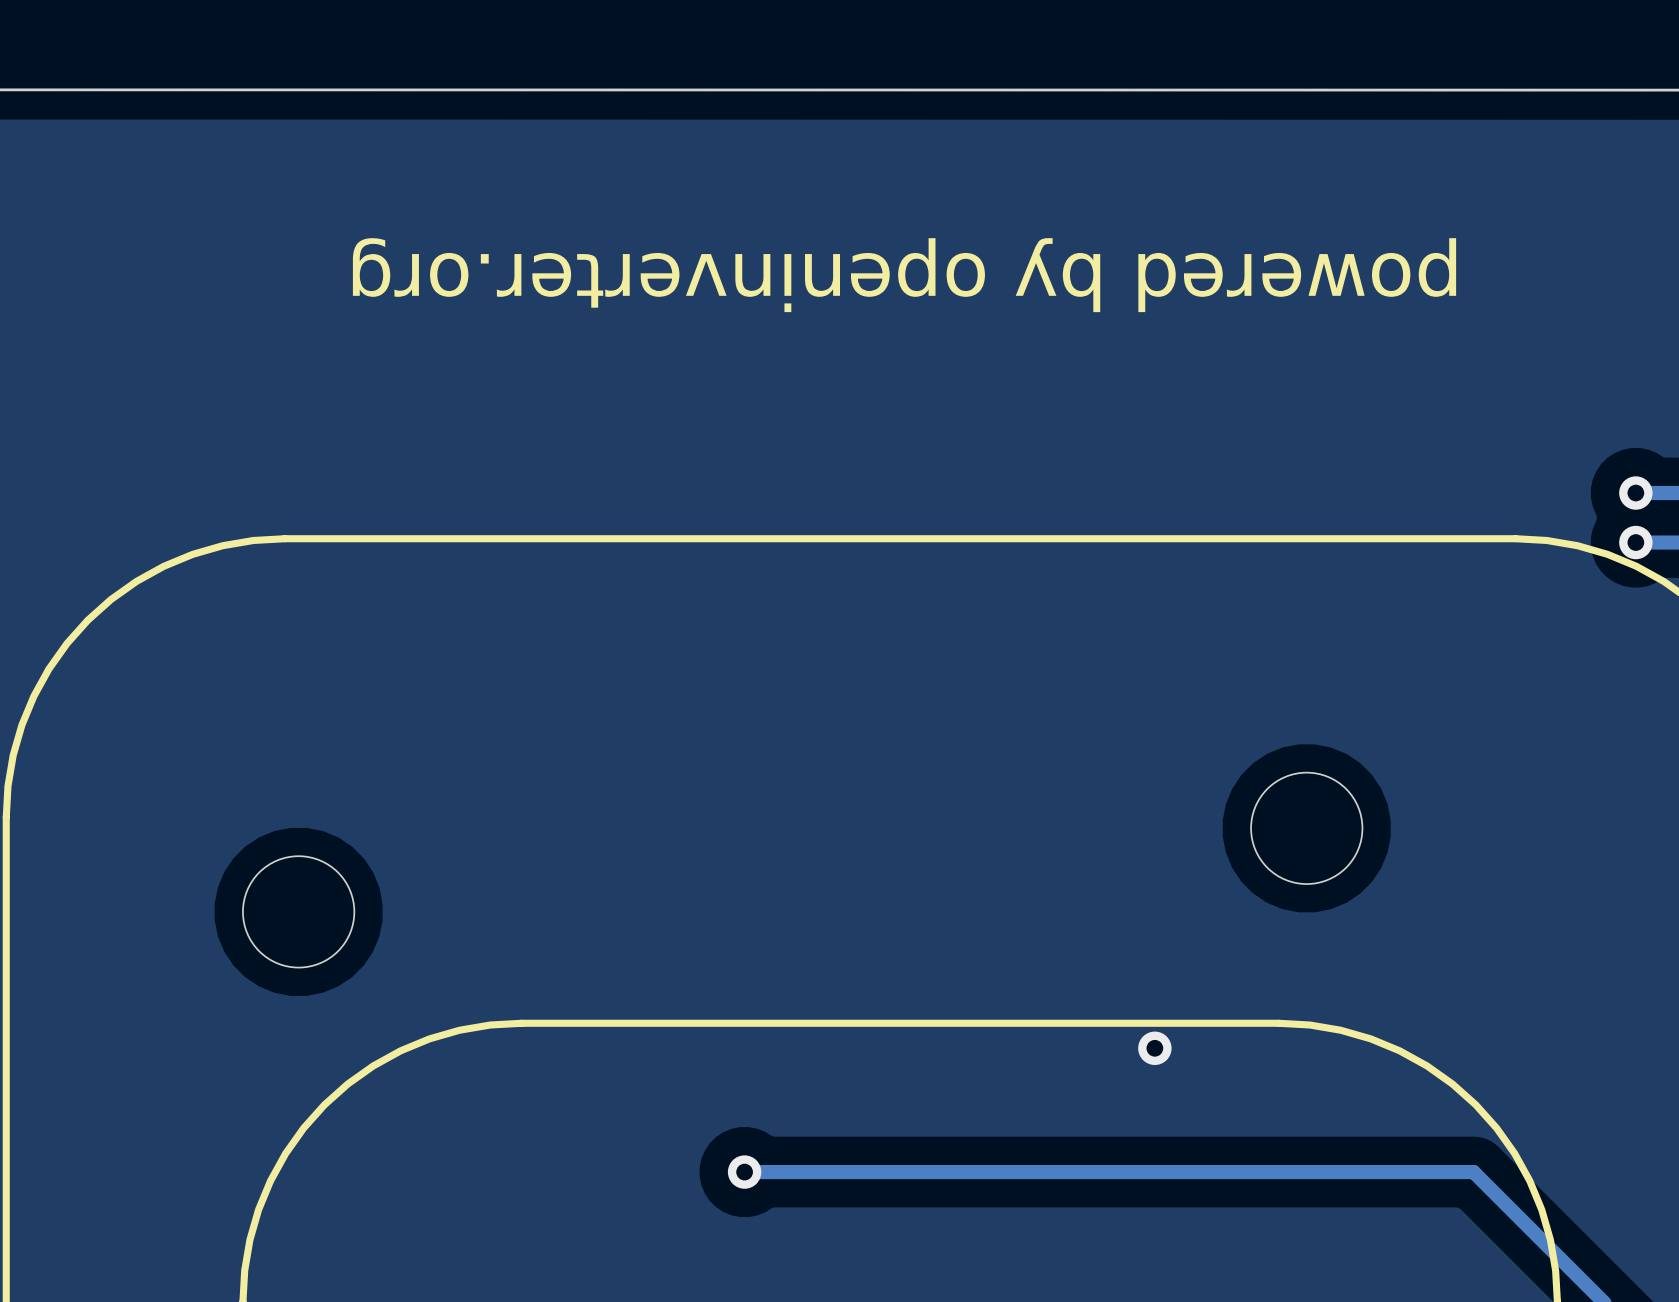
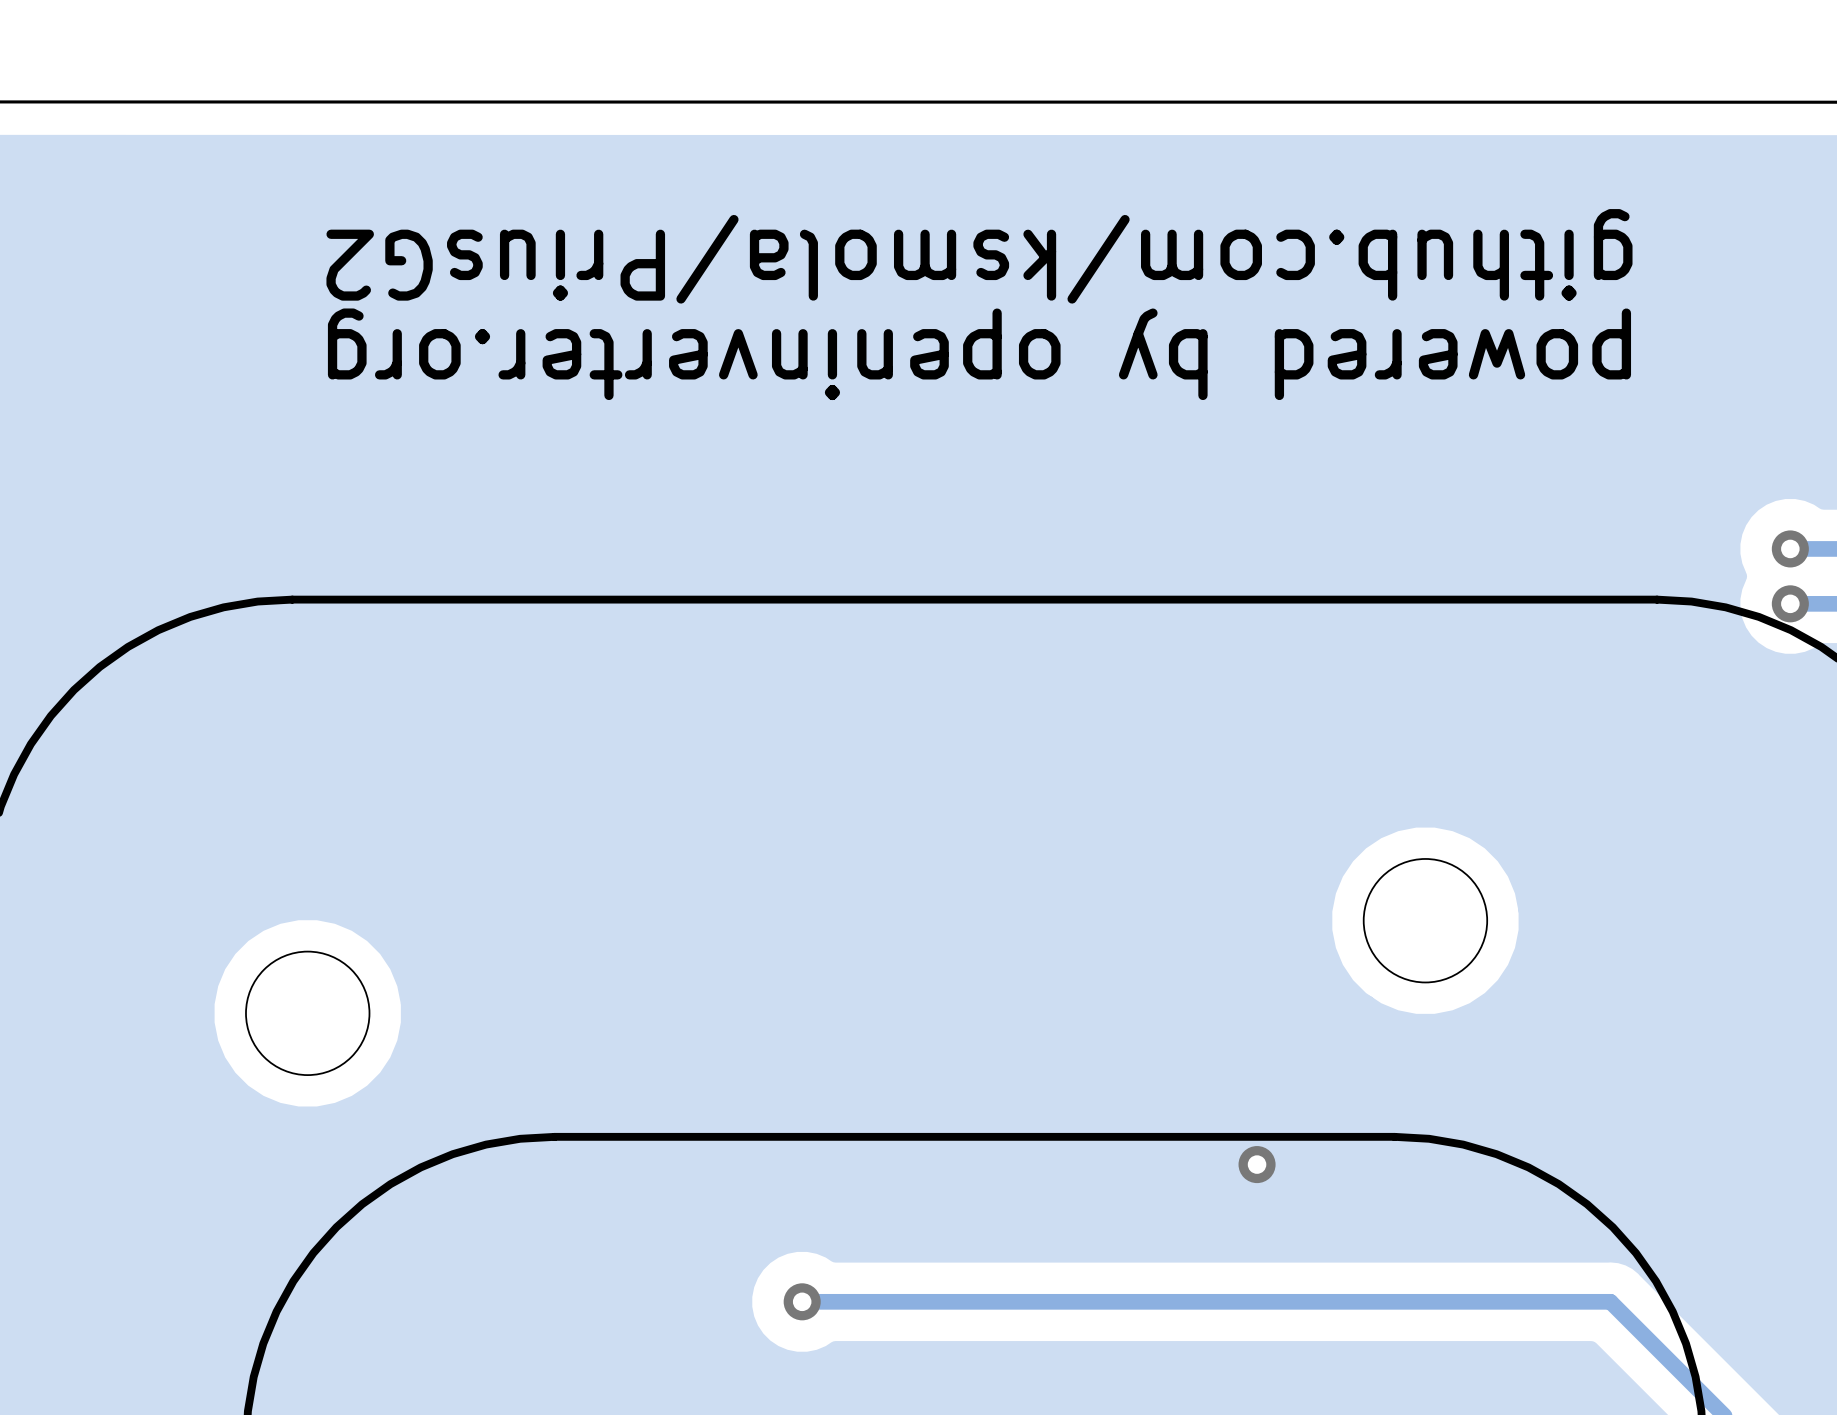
text: none -> github.com/ksmola/PriusG2 (979, 256)
text position: powered by openinverter.org (904, 275) -> powered by openinverter.org (979, 354)

